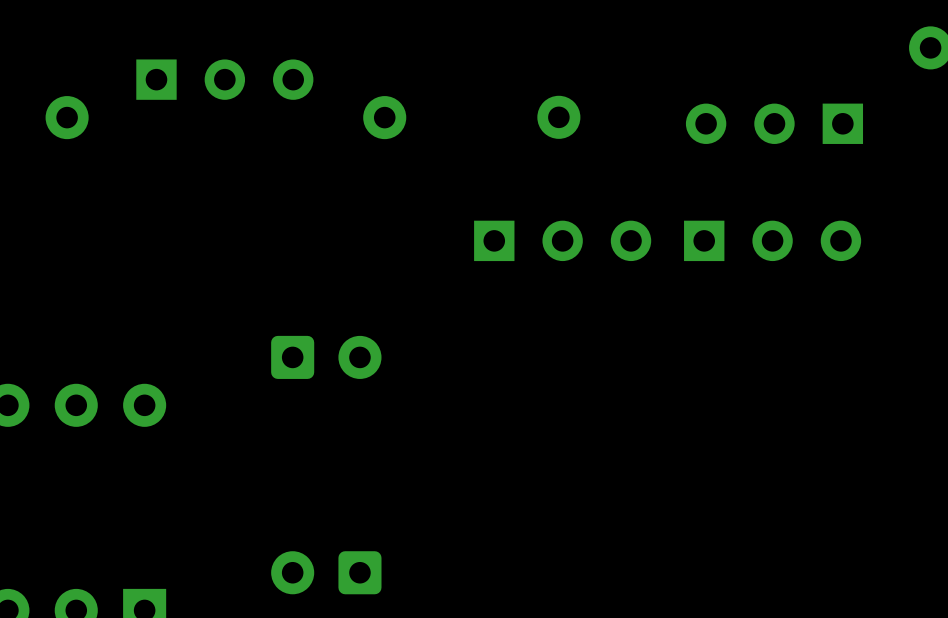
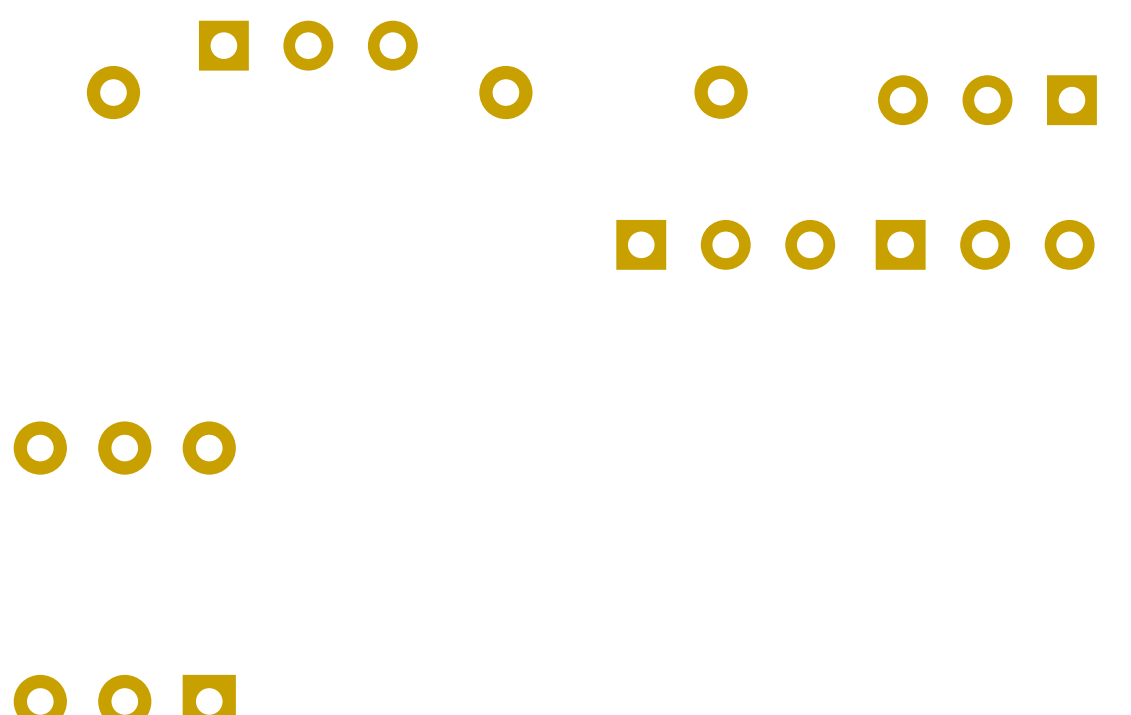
part: (326, 357) -> none
part: (326, 572) -> none

